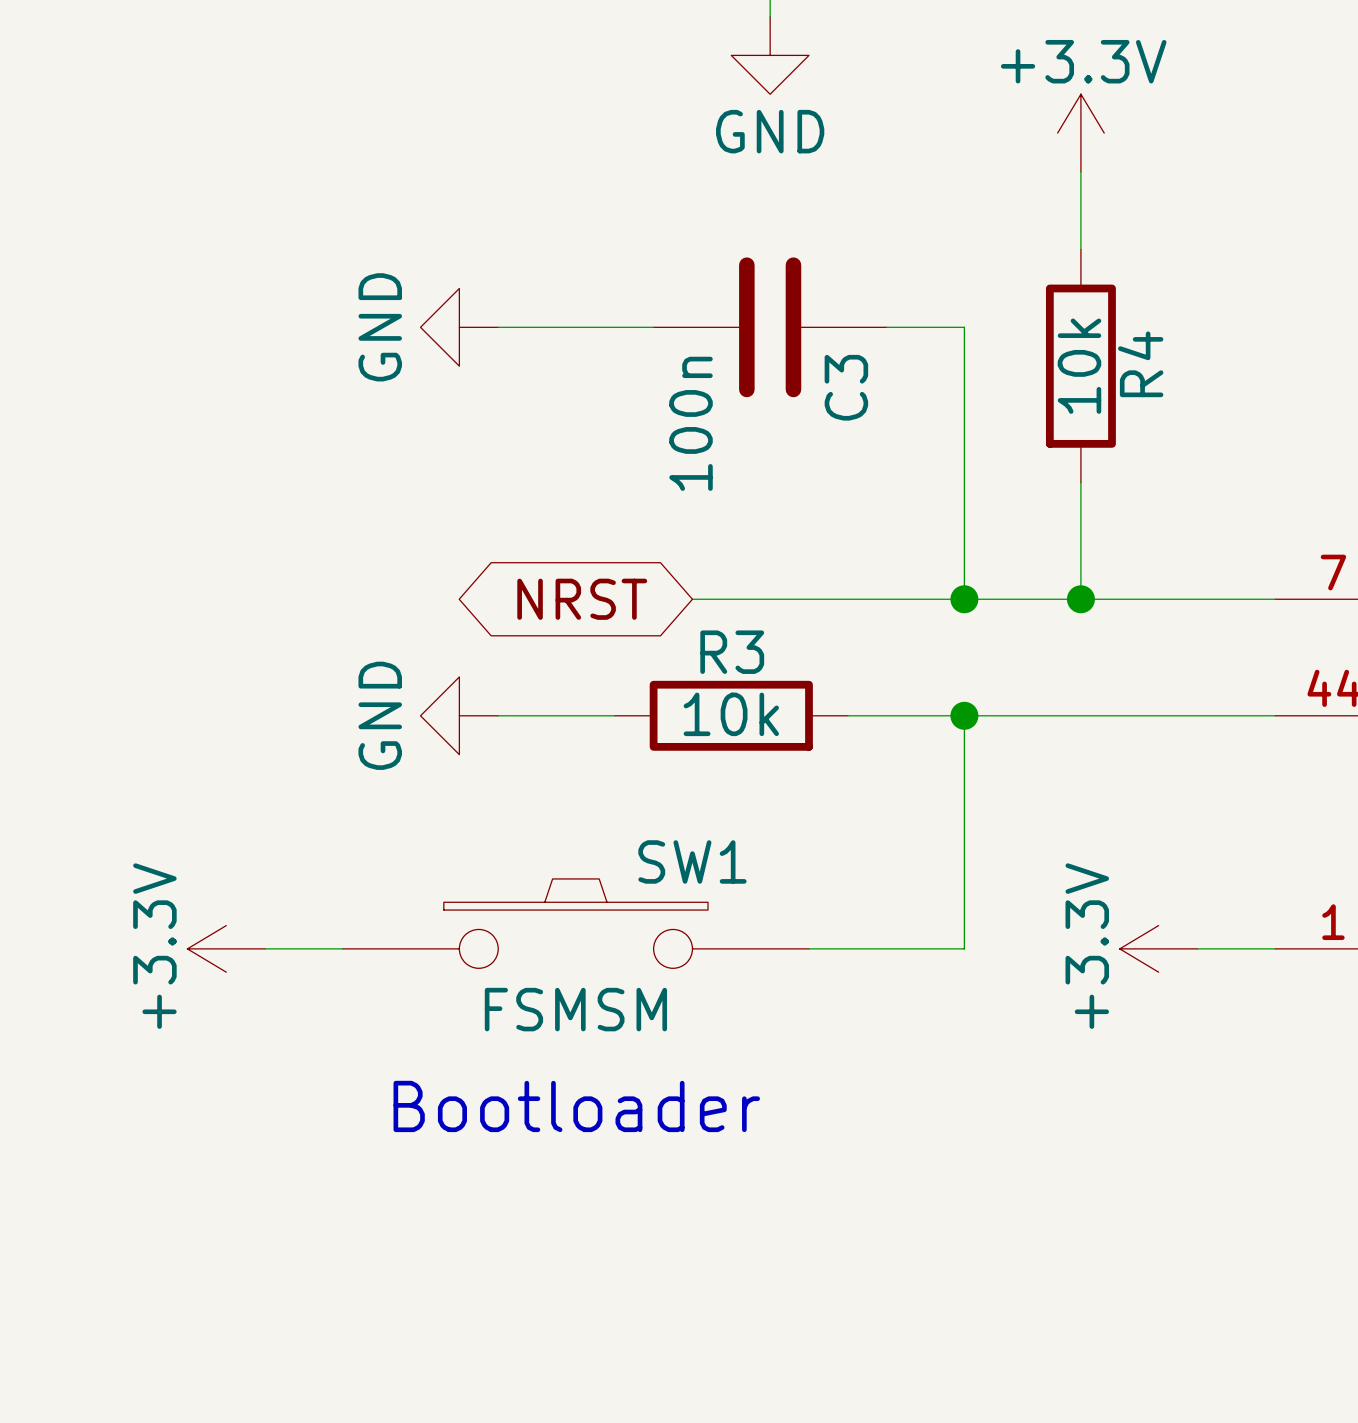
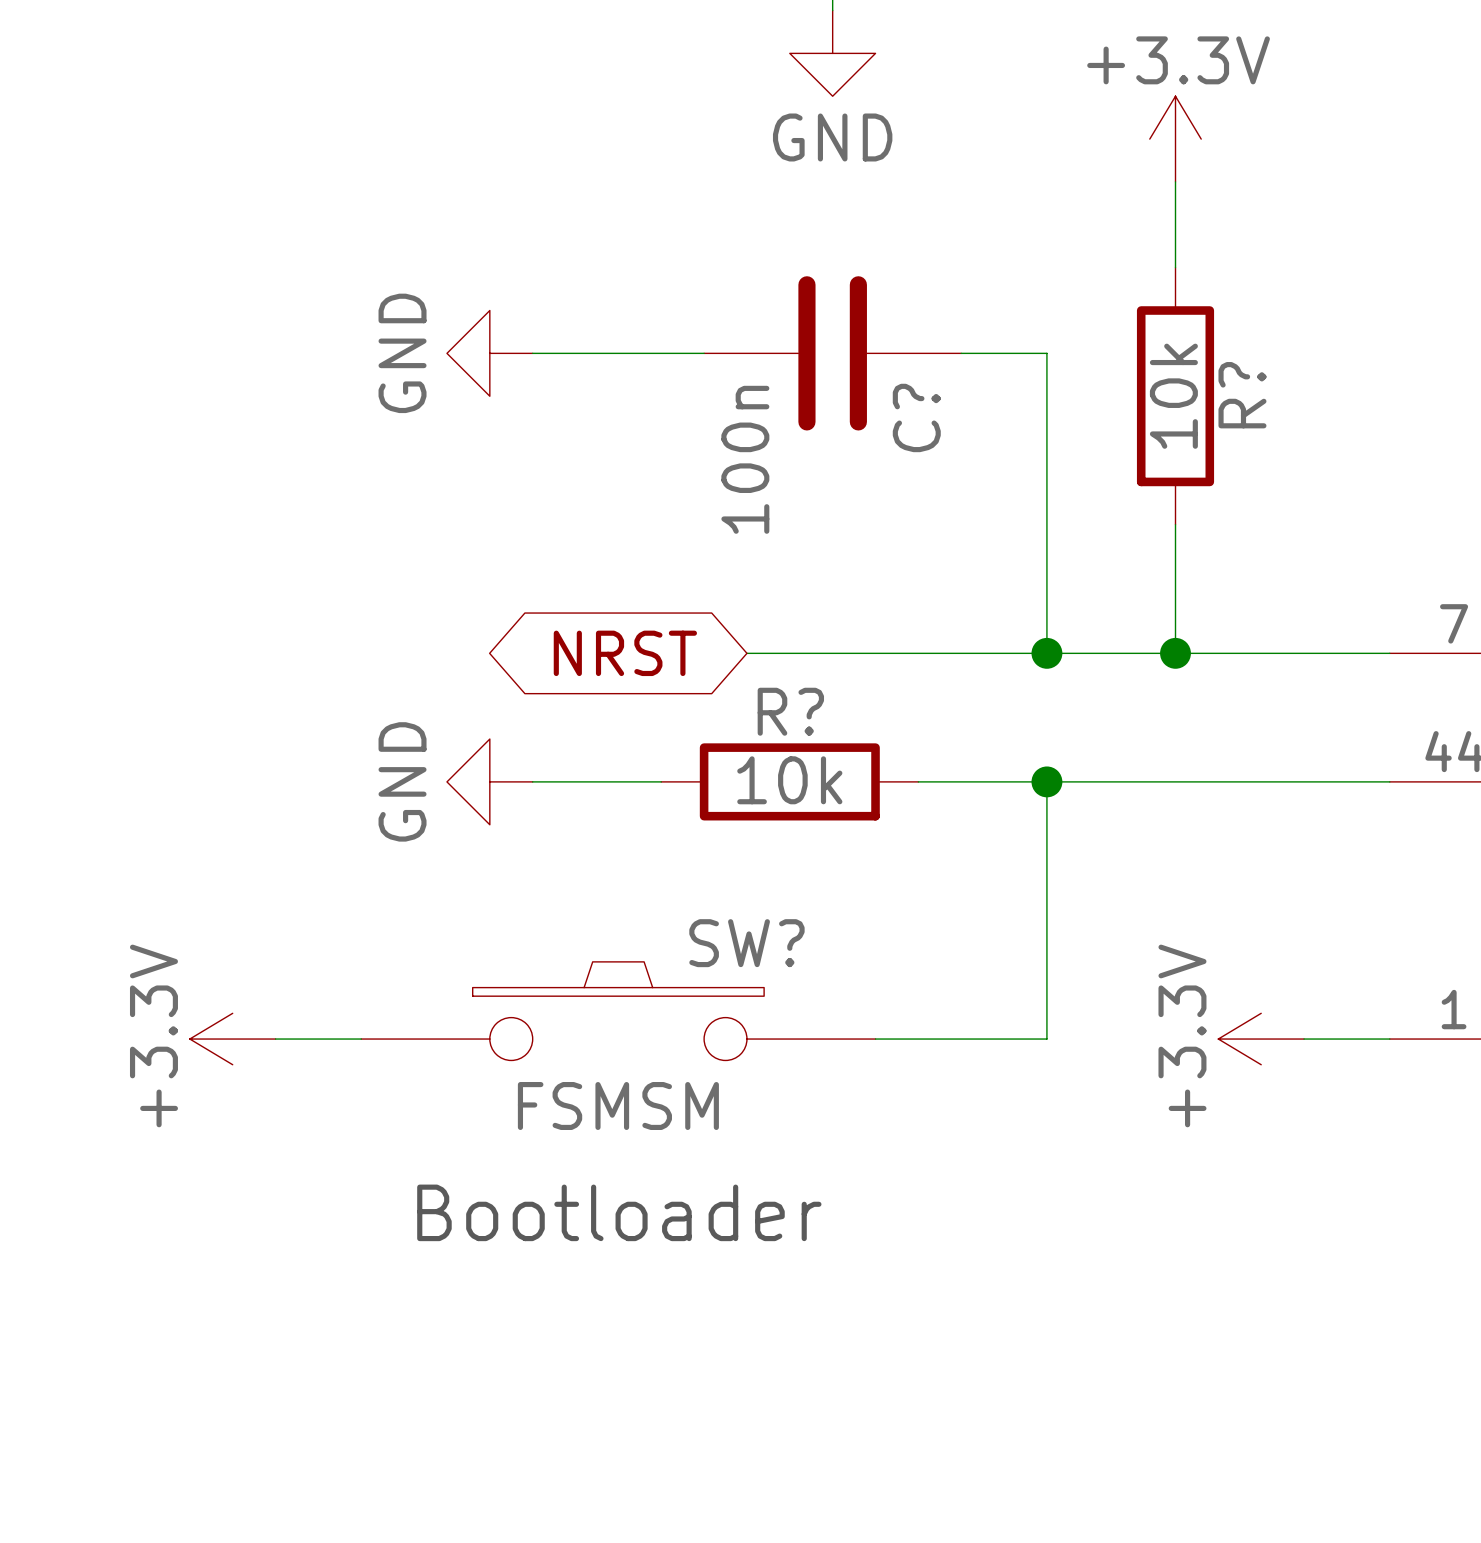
R4 name: R4 (1140, 364) -> R? (1242, 395)
C3 name: C3 (846, 387) -> C? (916, 417)
R3 name: R3 (732, 652) -> R? (790, 711)
SW1 name: SW1 (692, 861) -> SW? (746, 943)

